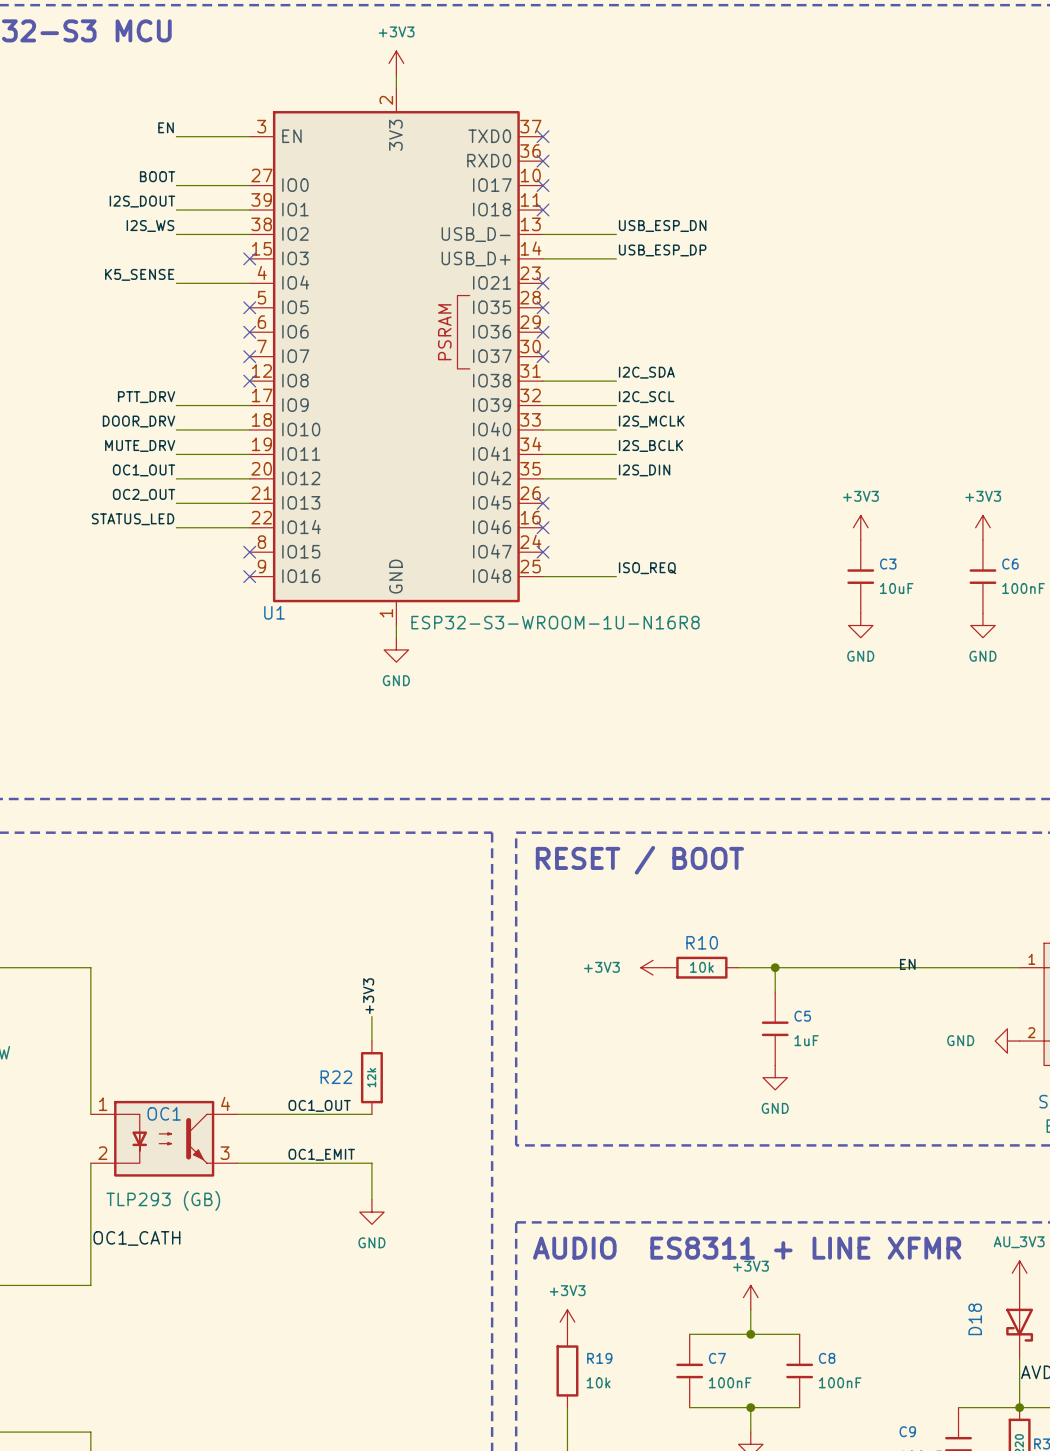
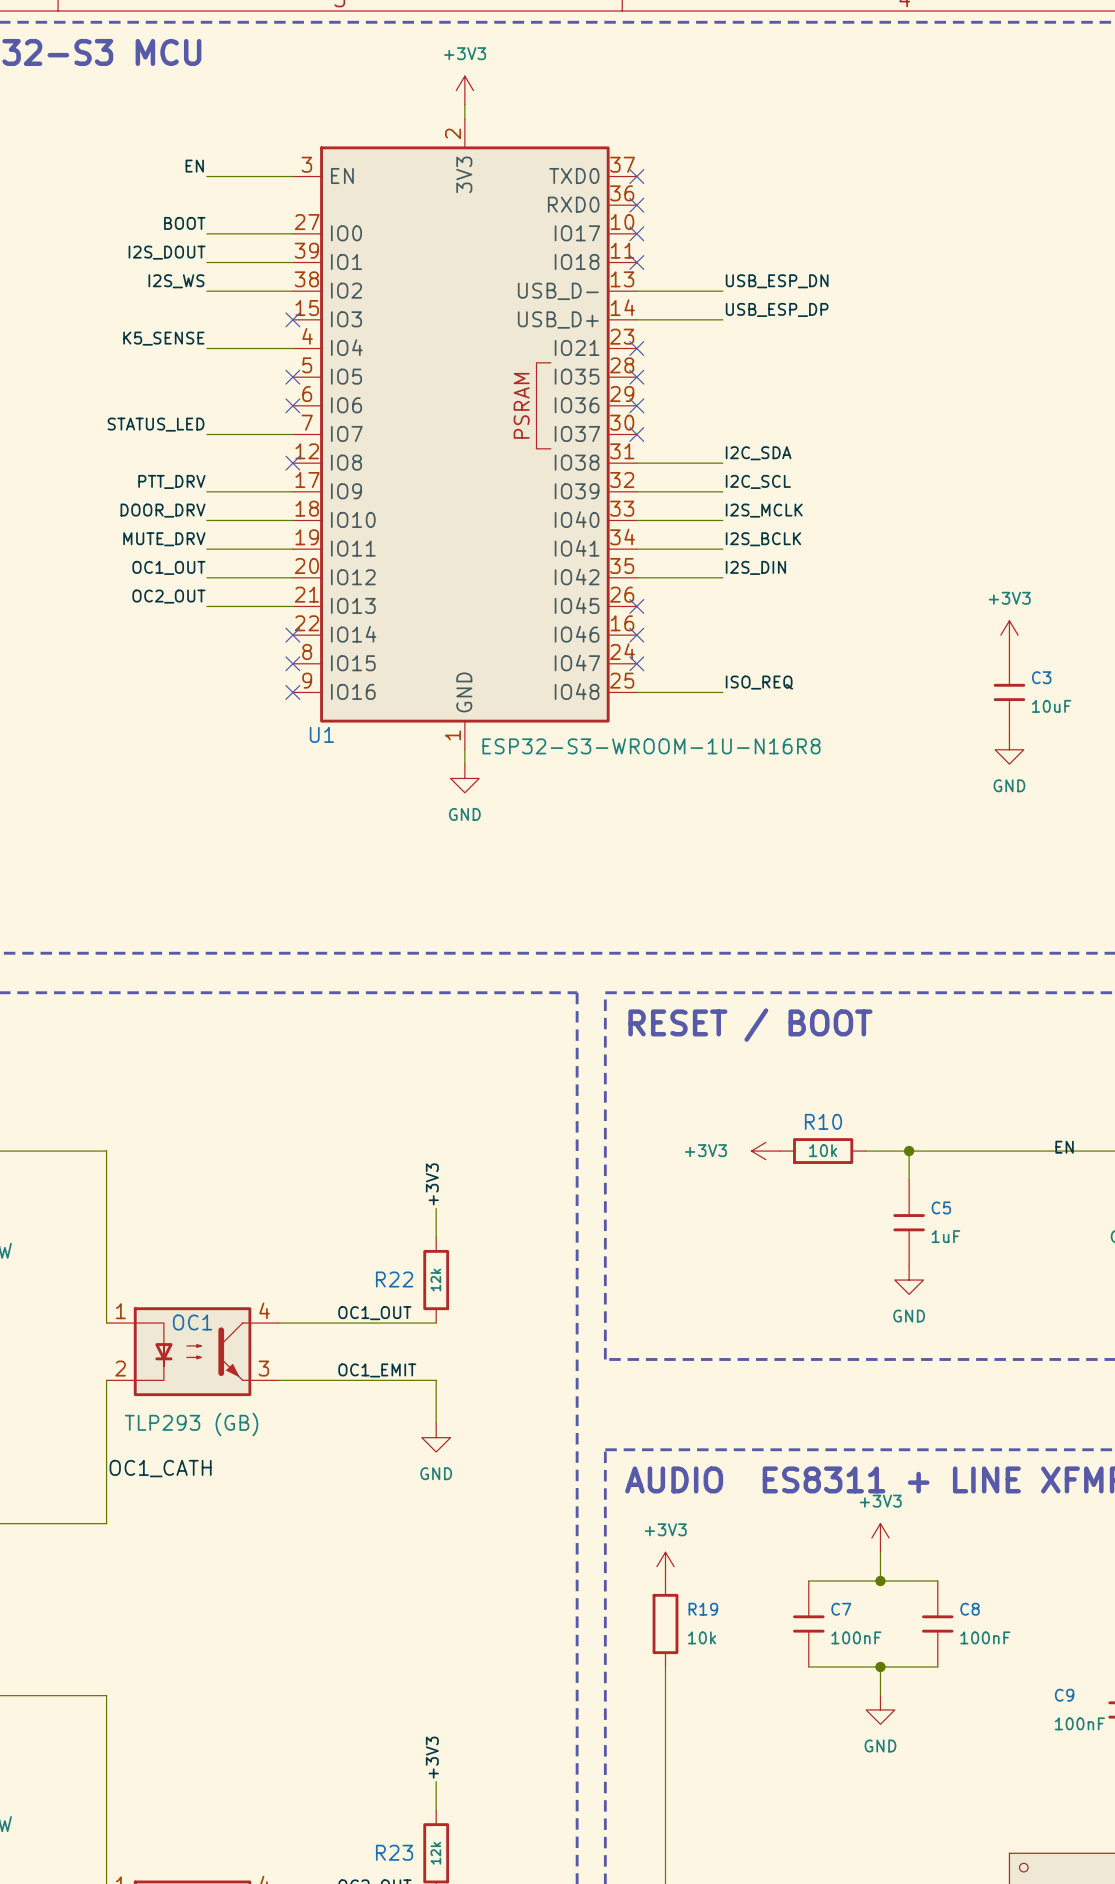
no-connect mark: (249, 356) -> none
label position: STATUS_LED (133, 519) -> STATUS_LED (156, 424)
wire: (176, 527) (249, 527) -> (206, 434) (292, 434)
no-connect mark: none -> (292, 635)

